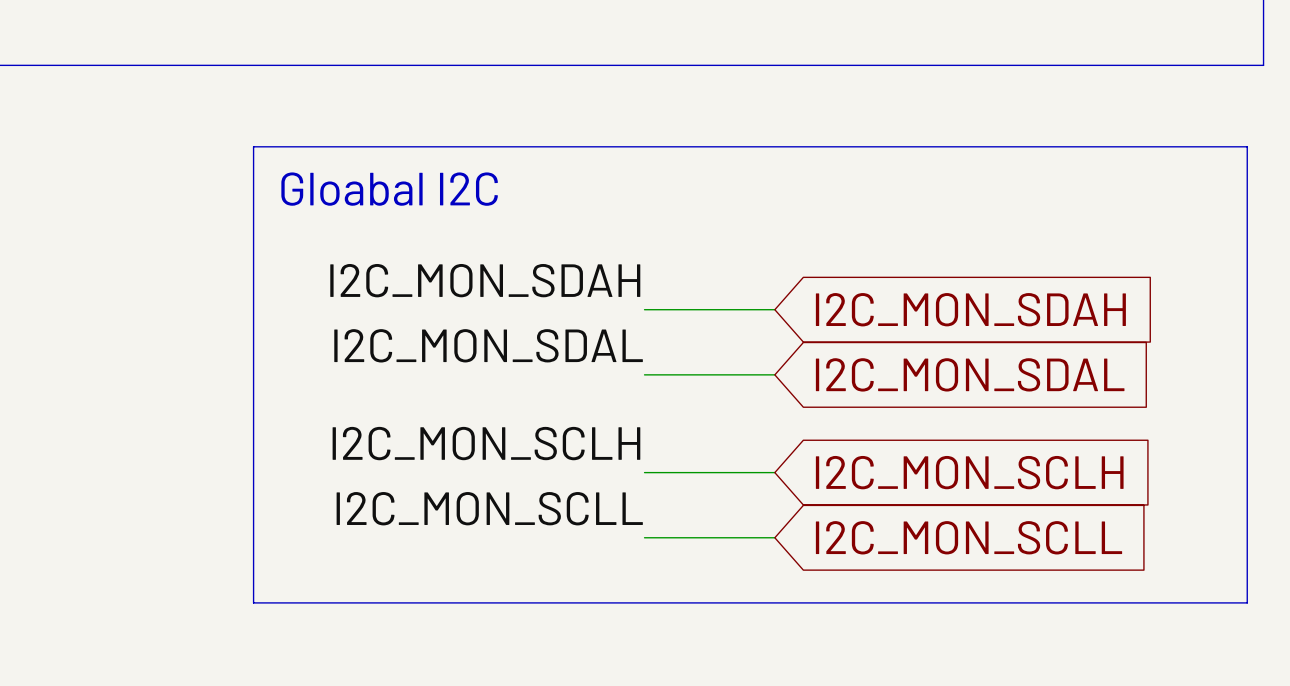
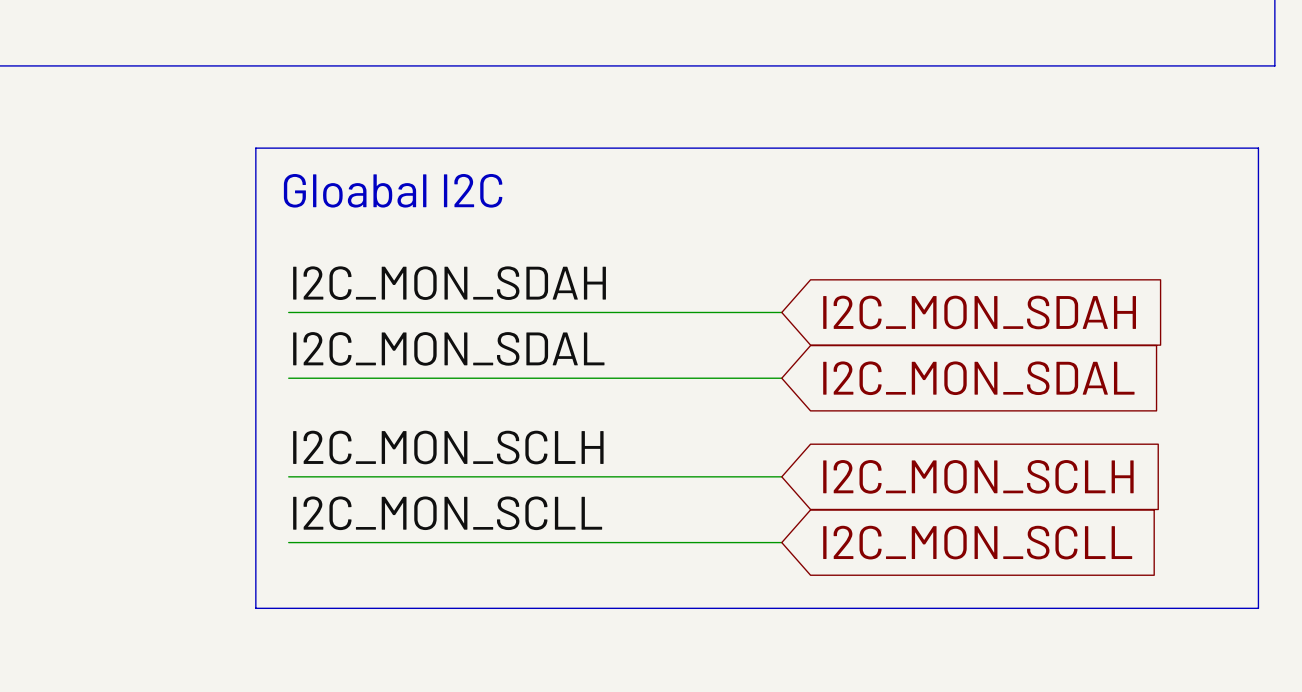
label position: I2C_MON_SDAH (485, 280) -> I2C_MON_SDAH (449, 283)
wire: none -> (288, 312) (650, 312)
label position: I2C_MON_SDAL (488, 345) -> I2C_MON_SDAL (448, 348)
wire: none -> (288, 378) (650, 378)
label position: I2C_MON_SCLH (486, 443) -> I2C_MON_SCLH (448, 447)
wire: none -> (288, 476) (650, 476)
label position: I2C_MON_SCLL (489, 508) -> I2C_MON_SCLL (447, 513)
wire: none -> (288, 542) (650, 542)

